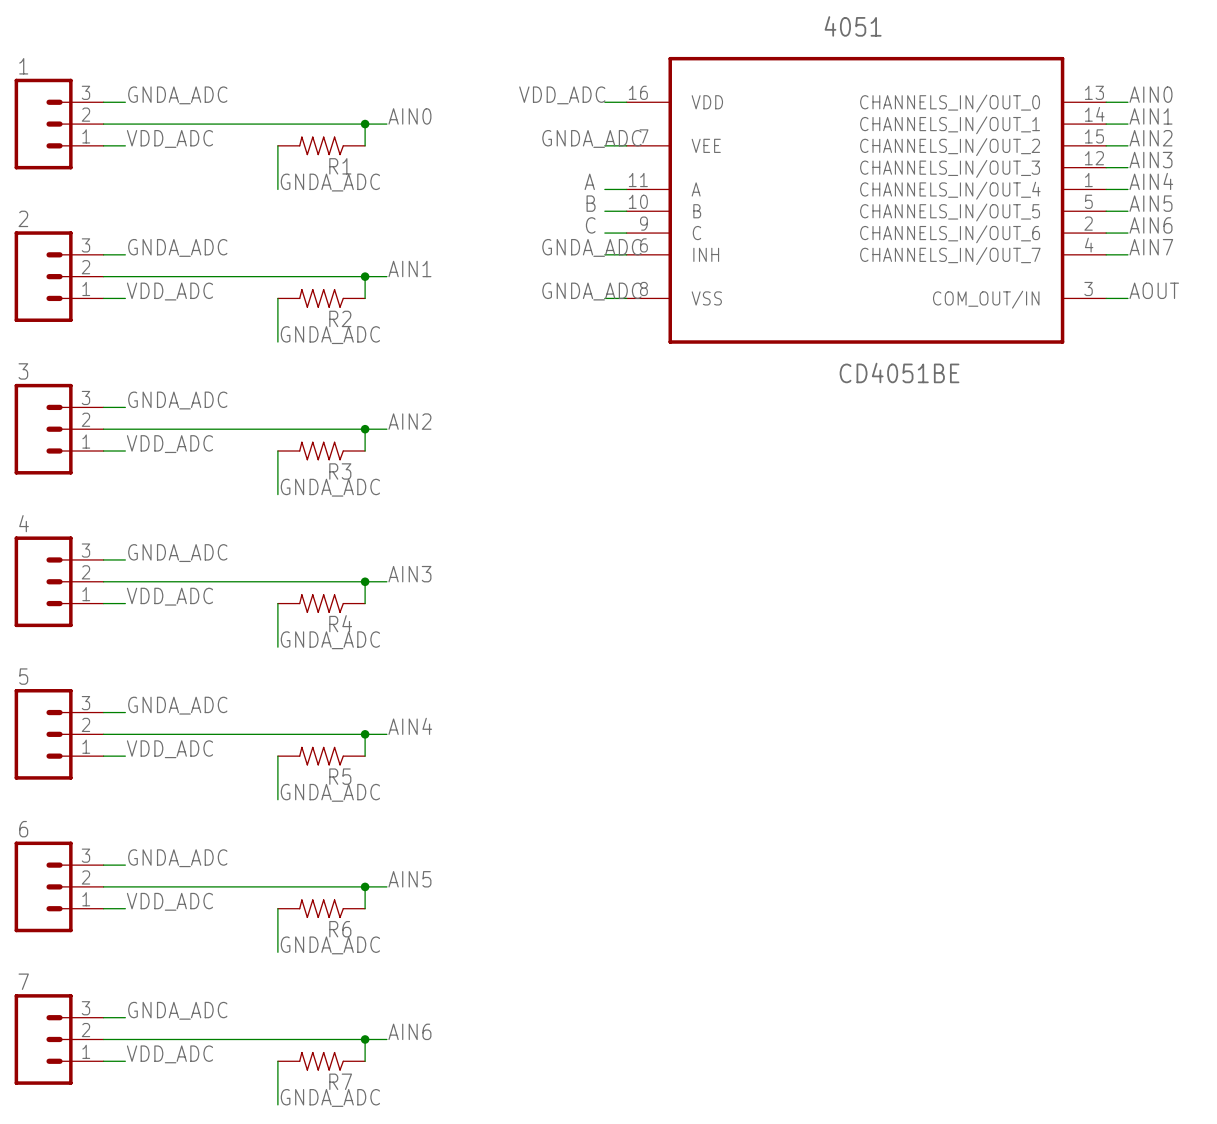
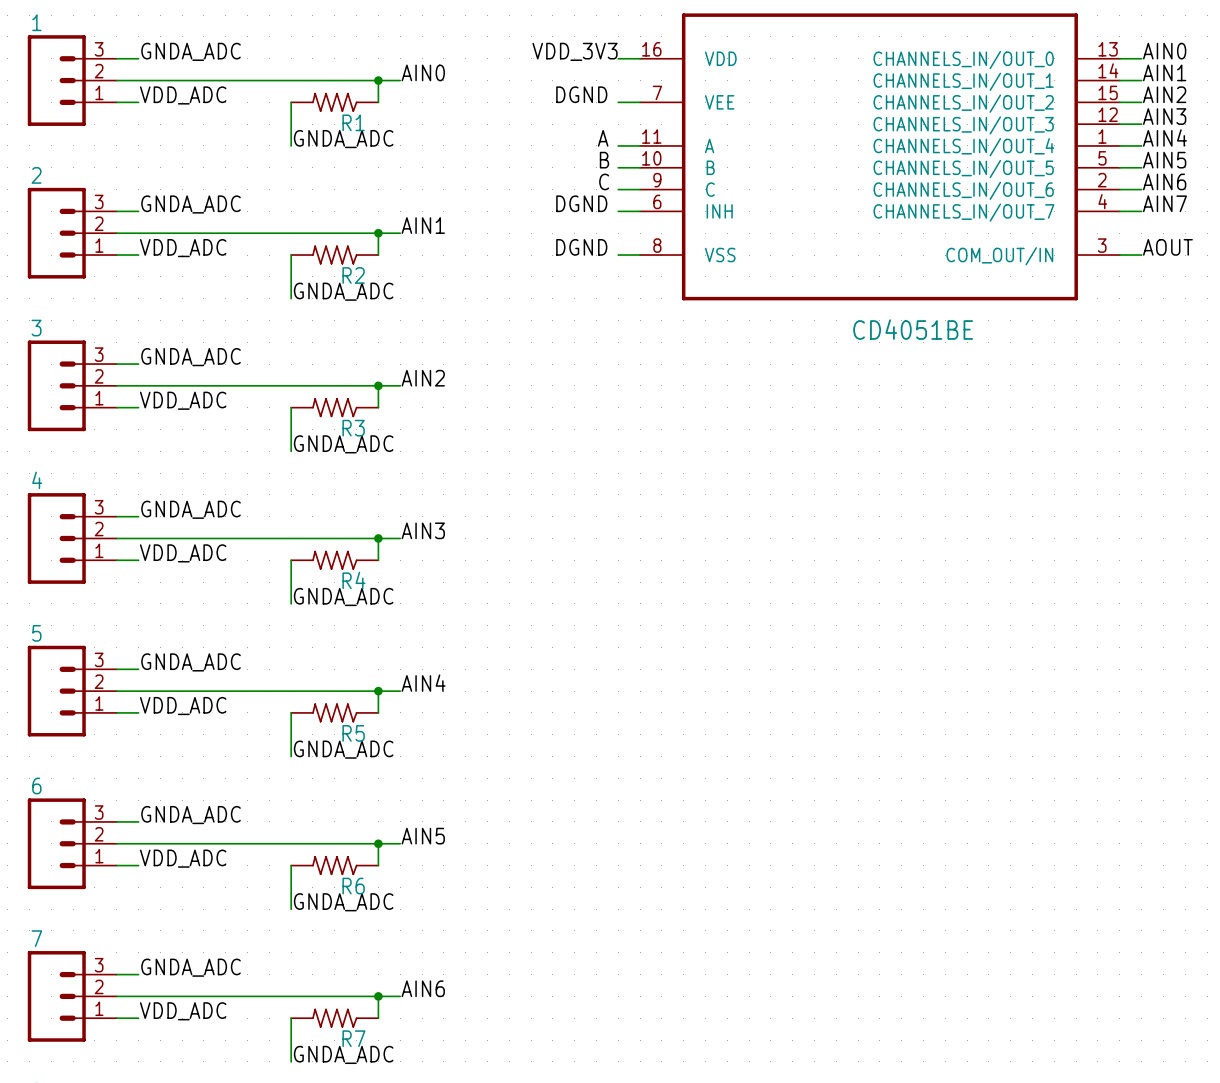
label: VDD_ADC (562, 95) -> VDD_3V3 (575, 51)
label: GNDA_ADC (591, 138) -> DGND (581, 94)
label: GNDA_ADC (591, 247) -> DGND (581, 203)
label: GNDA_ADC (591, 291) -> DGND (581, 247)

